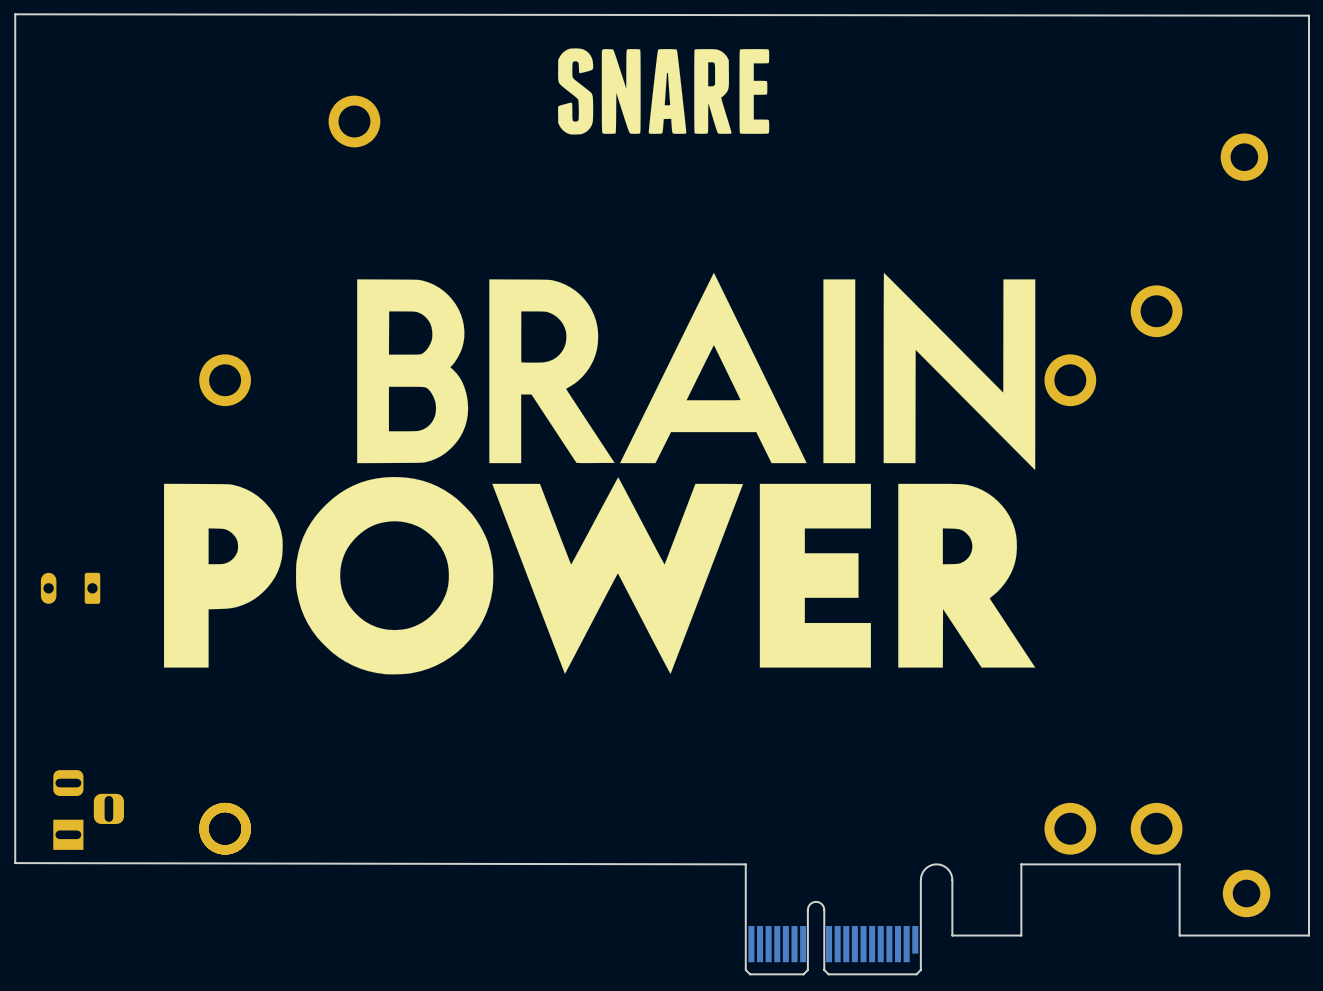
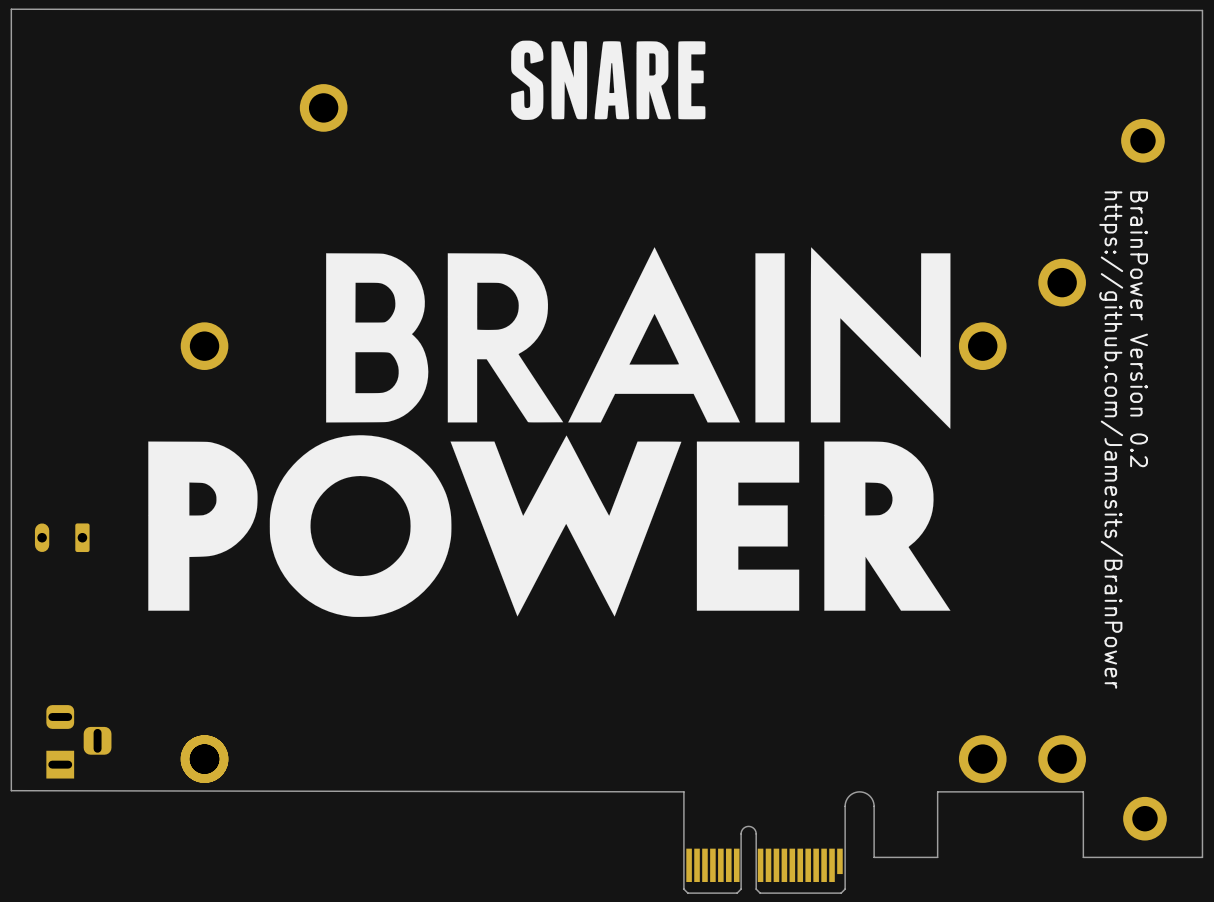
text: none -> BrainPower Version 0.2 (1139, 329)
text: none -> https://github.com/Jamesits/BrainPower (1111, 440)

